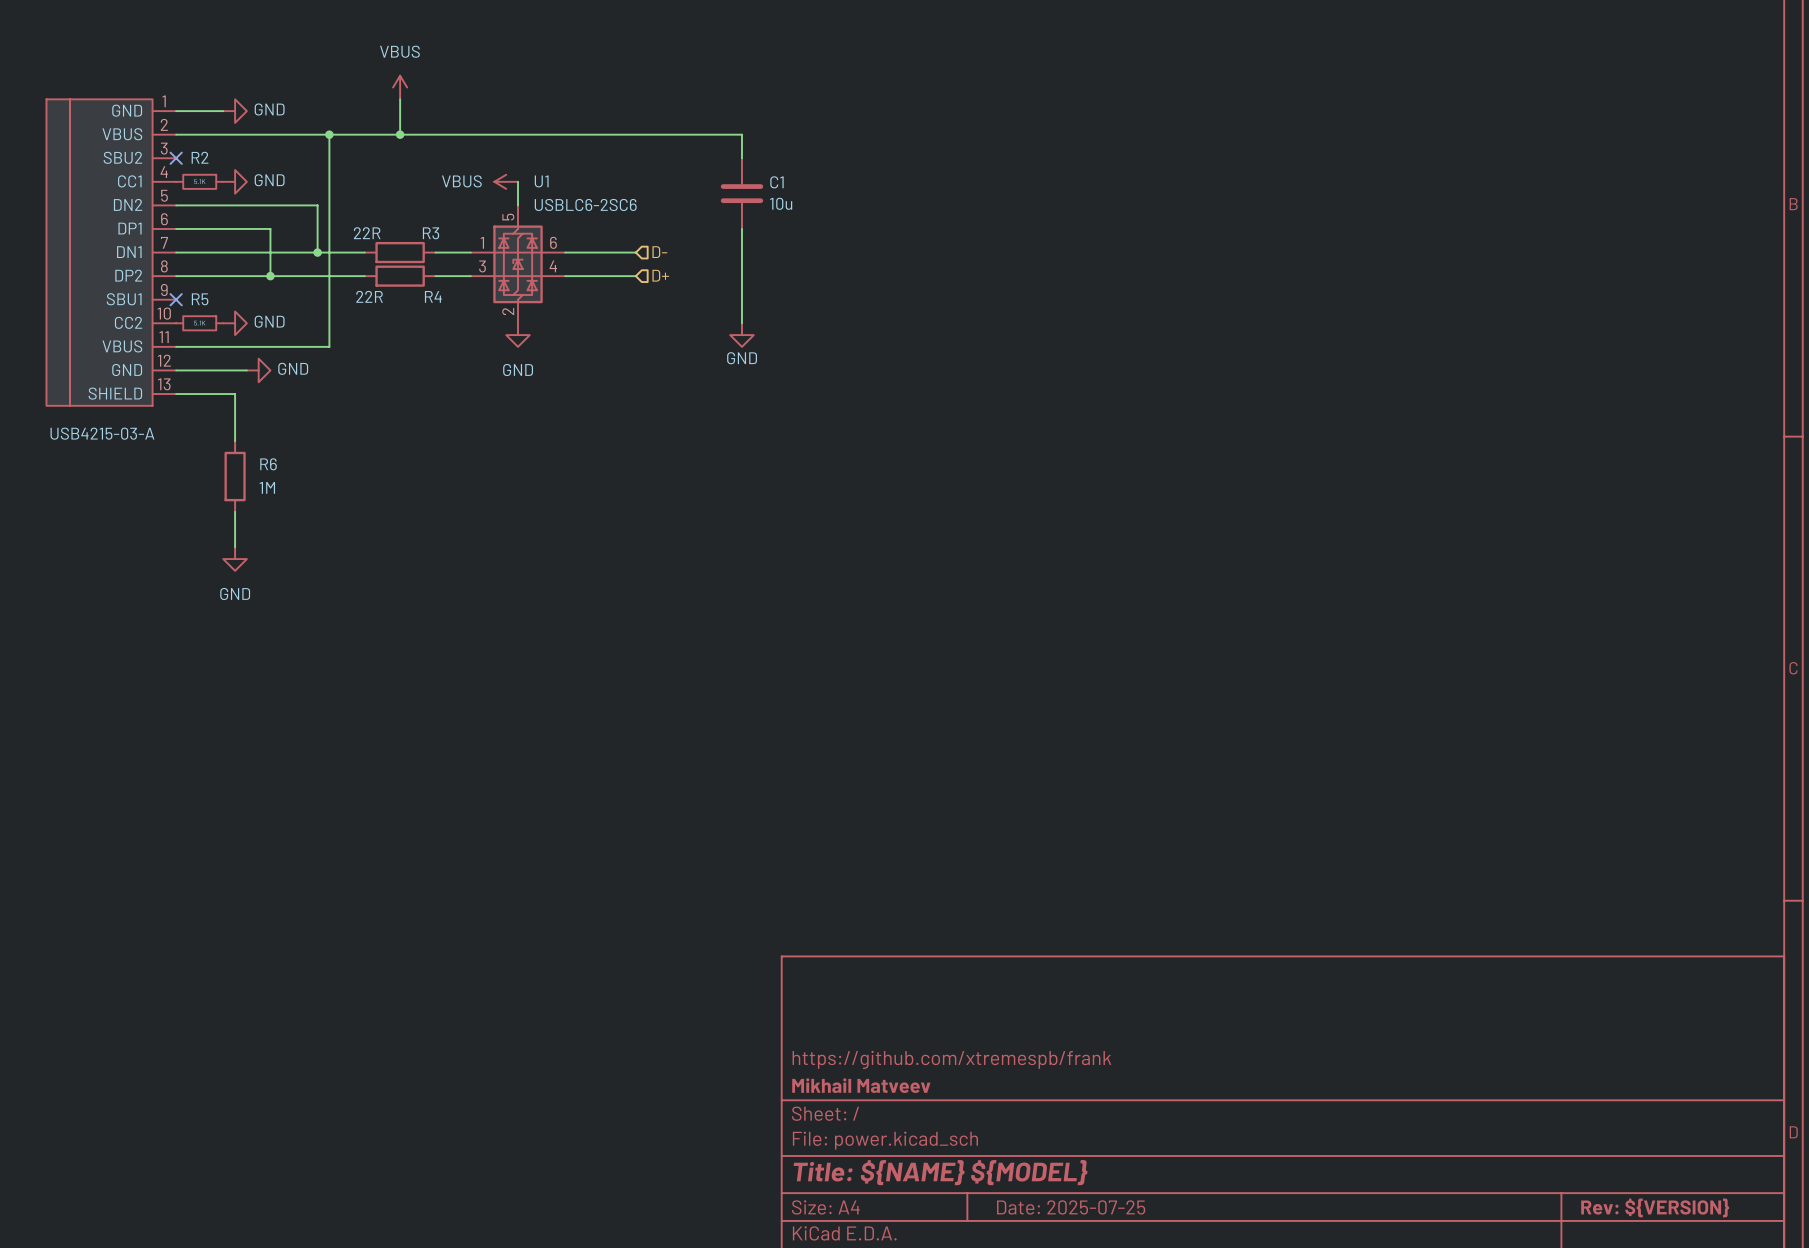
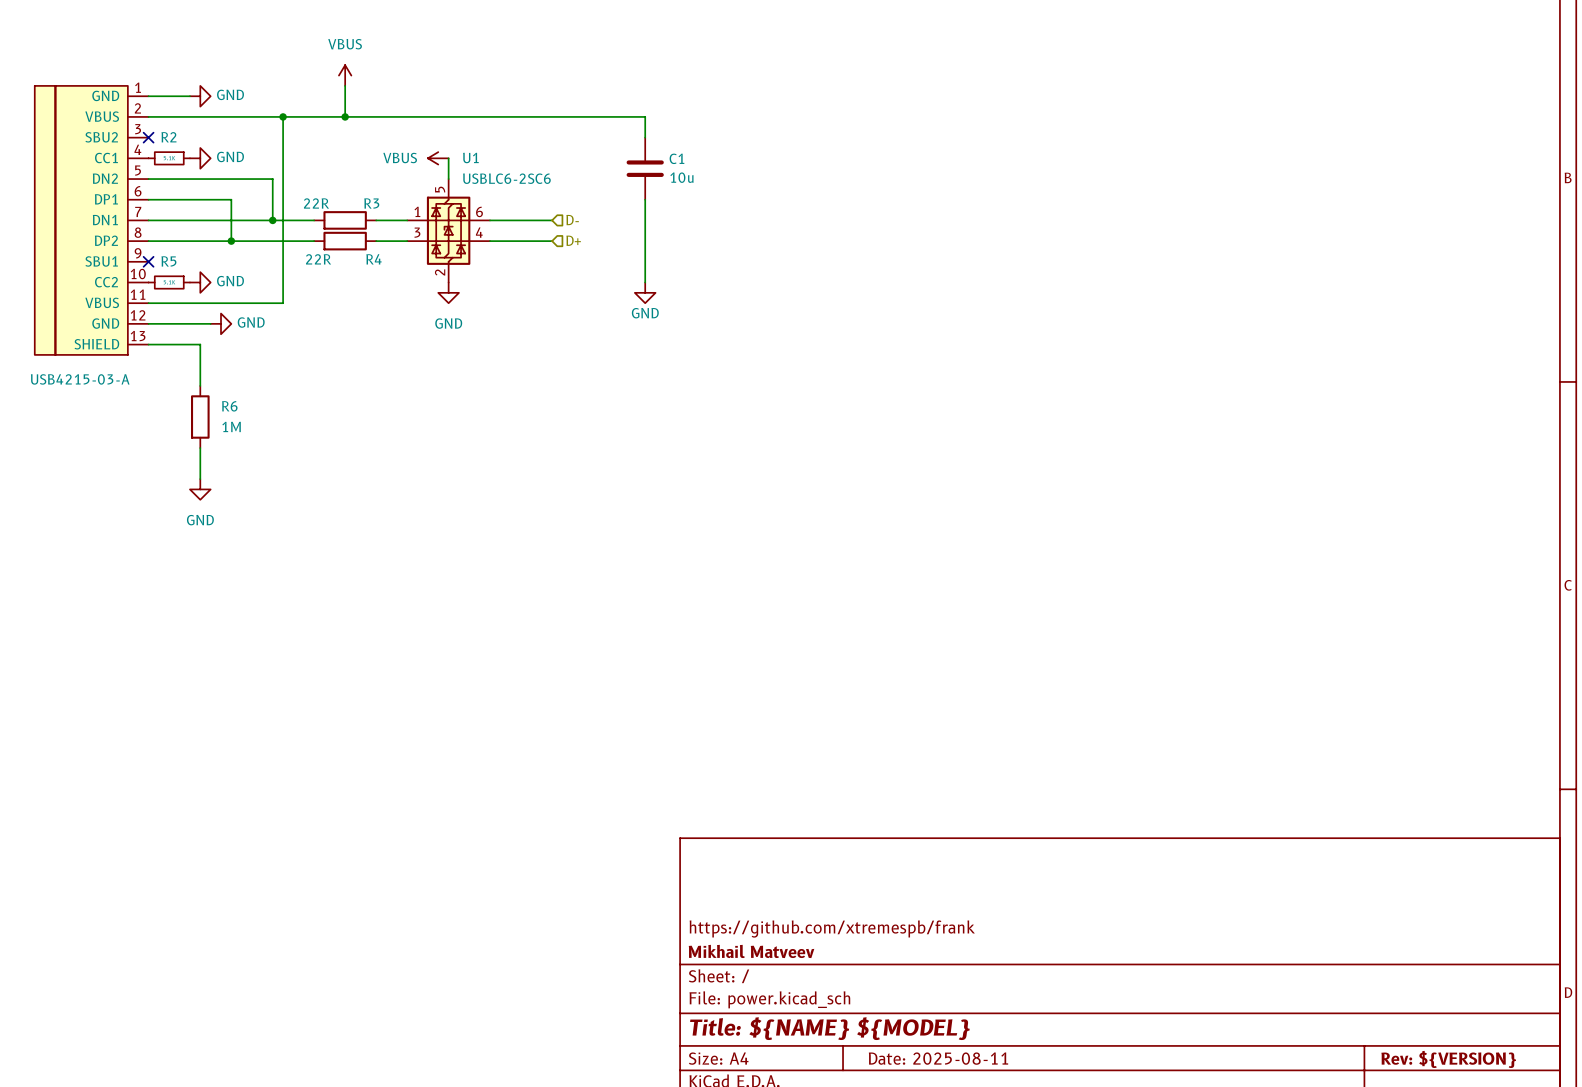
title block: Date: 2025-07-25 (1071, 1207) -> Date: 2025-08-11 (938, 1058)

